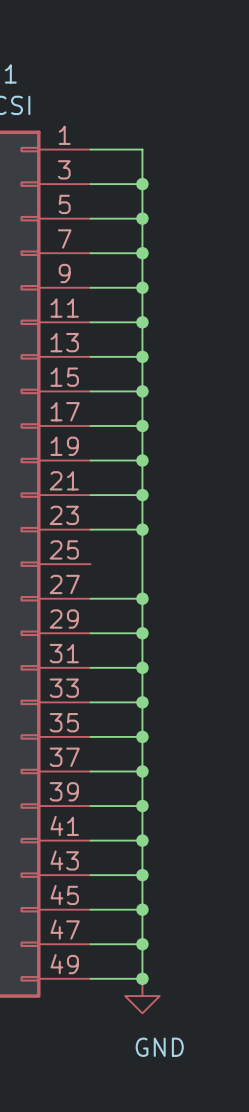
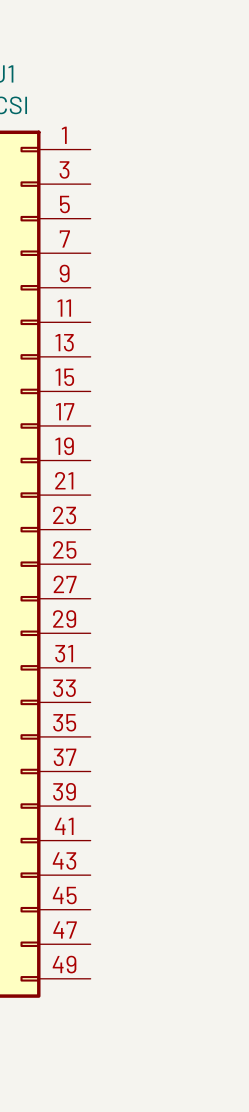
wire: (90, 149) (142, 149) (142, 978) (90, 978) -> none
wire: (90, 184) (142, 184) -> none
junction: (142, 184) -> none
wire: (90, 218) (142, 218) -> none
junction: (142, 218) -> none
wire: (90, 253) (142, 253) -> none
junction: (142, 253) -> none
wire: (90, 287) (142, 287) -> none
junction: (142, 287) -> none
wire: (90, 322) (142, 322) -> none
junction: (142, 322) -> none
wire: (90, 356) (142, 356) -> none
junction: (142, 356) -> none
wire: (90, 391) (142, 391) -> none
junction: (142, 391) -> none
wire: (90, 425) (142, 425) -> none
junction: (142, 425) -> none
wire: (90, 460) (142, 460) -> none
junction: (142, 460) -> none
wire: (90, 495) (142, 495) -> none
junction: (142, 495) -> none
wire: (90, 529) (142, 529) -> none
junction: (142, 529) -> none
wire: (90, 598) (142, 598) -> none
junction: (142, 598) -> none
wire: (90, 633) (142, 633) -> none
junction: (142, 633) -> none
wire: (90, 667) (142, 667) -> none
junction: (142, 667) -> none
wire: (90, 702) (142, 702) -> none
junction: (142, 702) -> none
wire: (90, 736) (142, 736) -> none
junction: (142, 736) -> none
wire: (90, 771) (142, 771) -> none
junction: (142, 771) -> none
wire: (90, 806) (142, 806) -> none
junction: (142, 806) -> none
wire: (90, 840) (142, 840) -> none
junction: (142, 840) -> none
wire: (90, 875) (142, 875) -> none
junction: (142, 875) -> none
wire: (90, 909) (142, 909) -> none
junction: (142, 909) -> none
wire: (90, 944) (142, 944) -> none
junction: (142, 944) -> none
junction: (142, 978) -> none
power symbol: GND (142, 996) -> none

